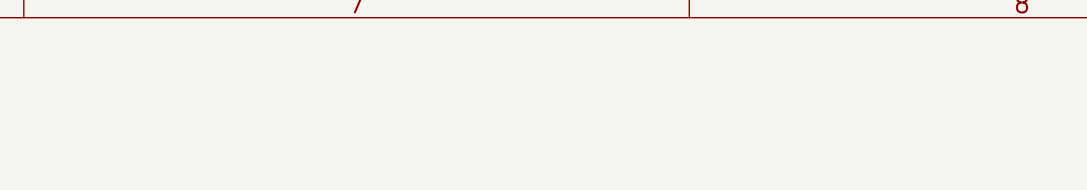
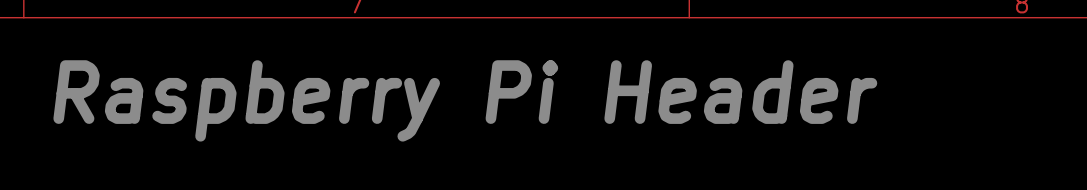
text: none -> Raspberry Pi Header (465, 100)

